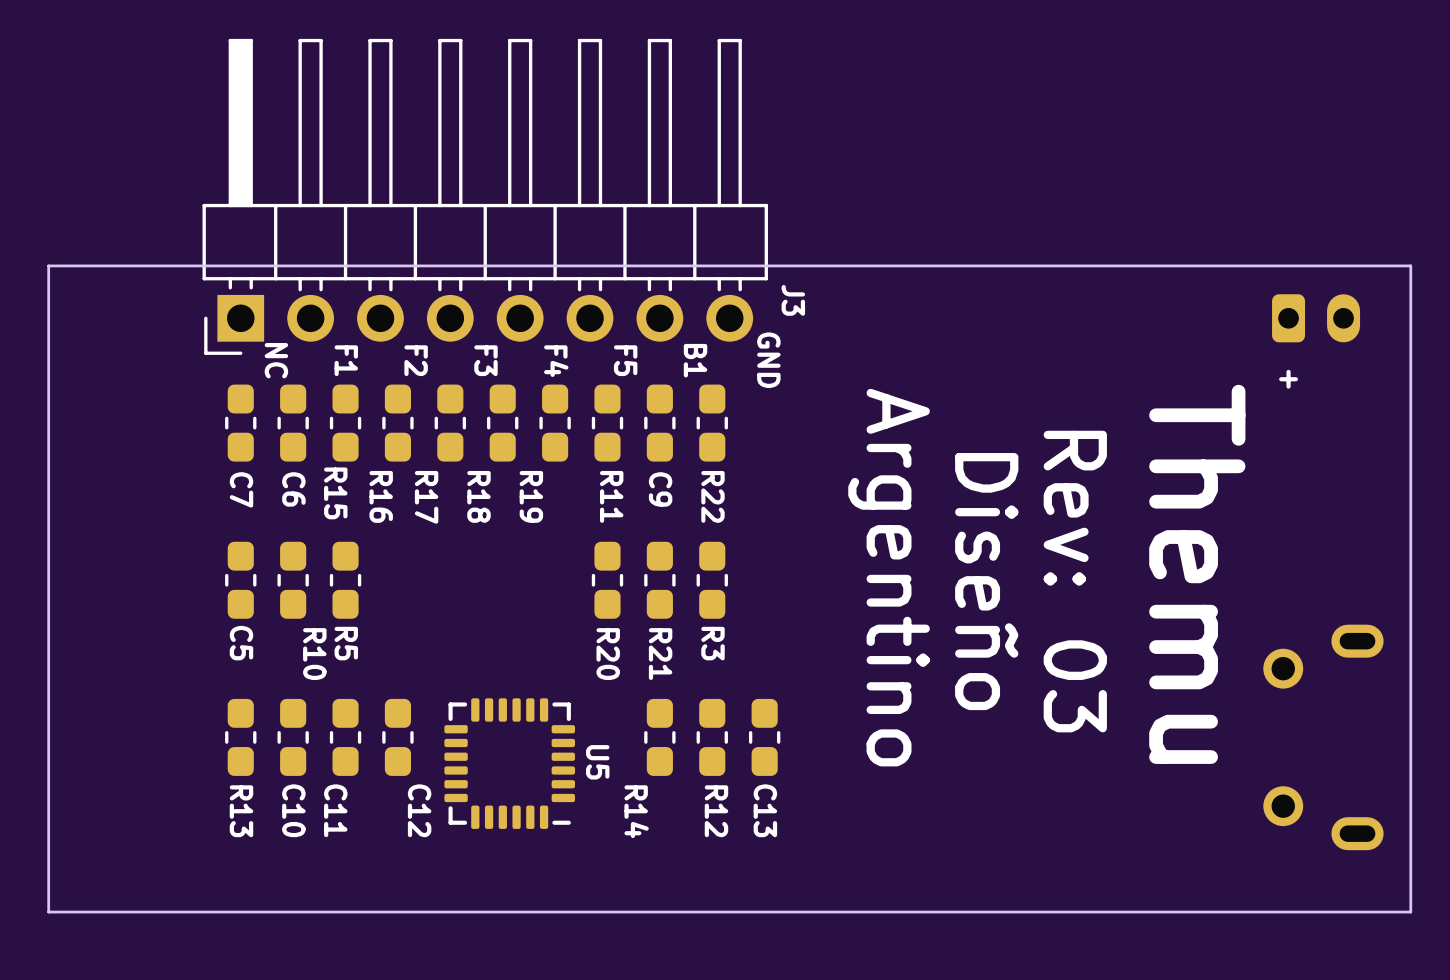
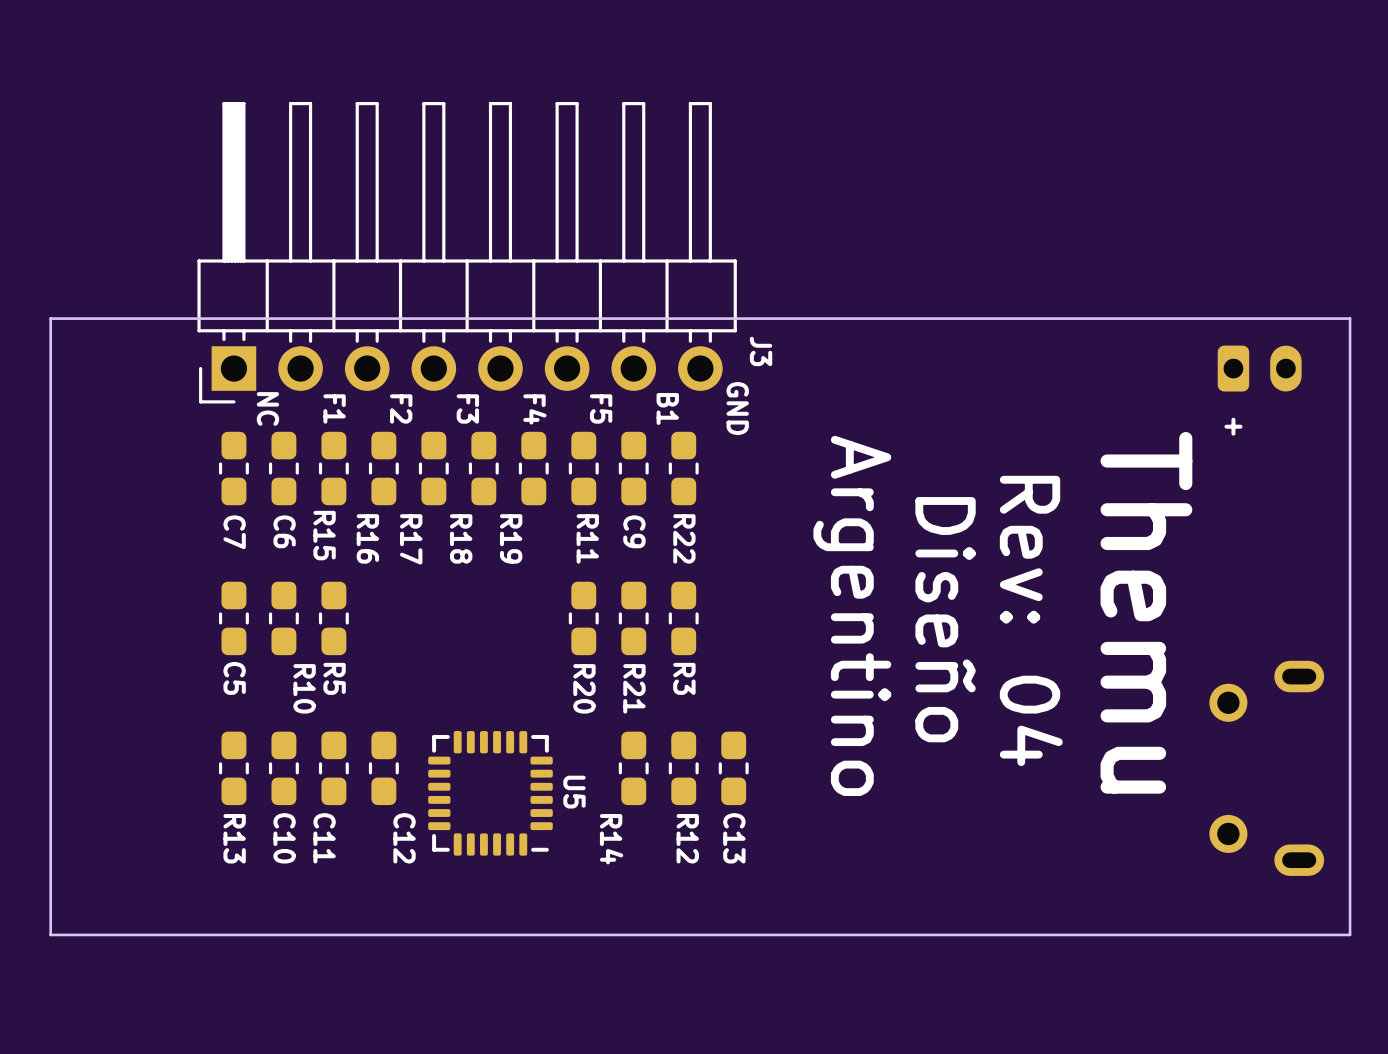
text: Rev: 03 (1075, 581) -> Rev: 04 (1031, 620)

